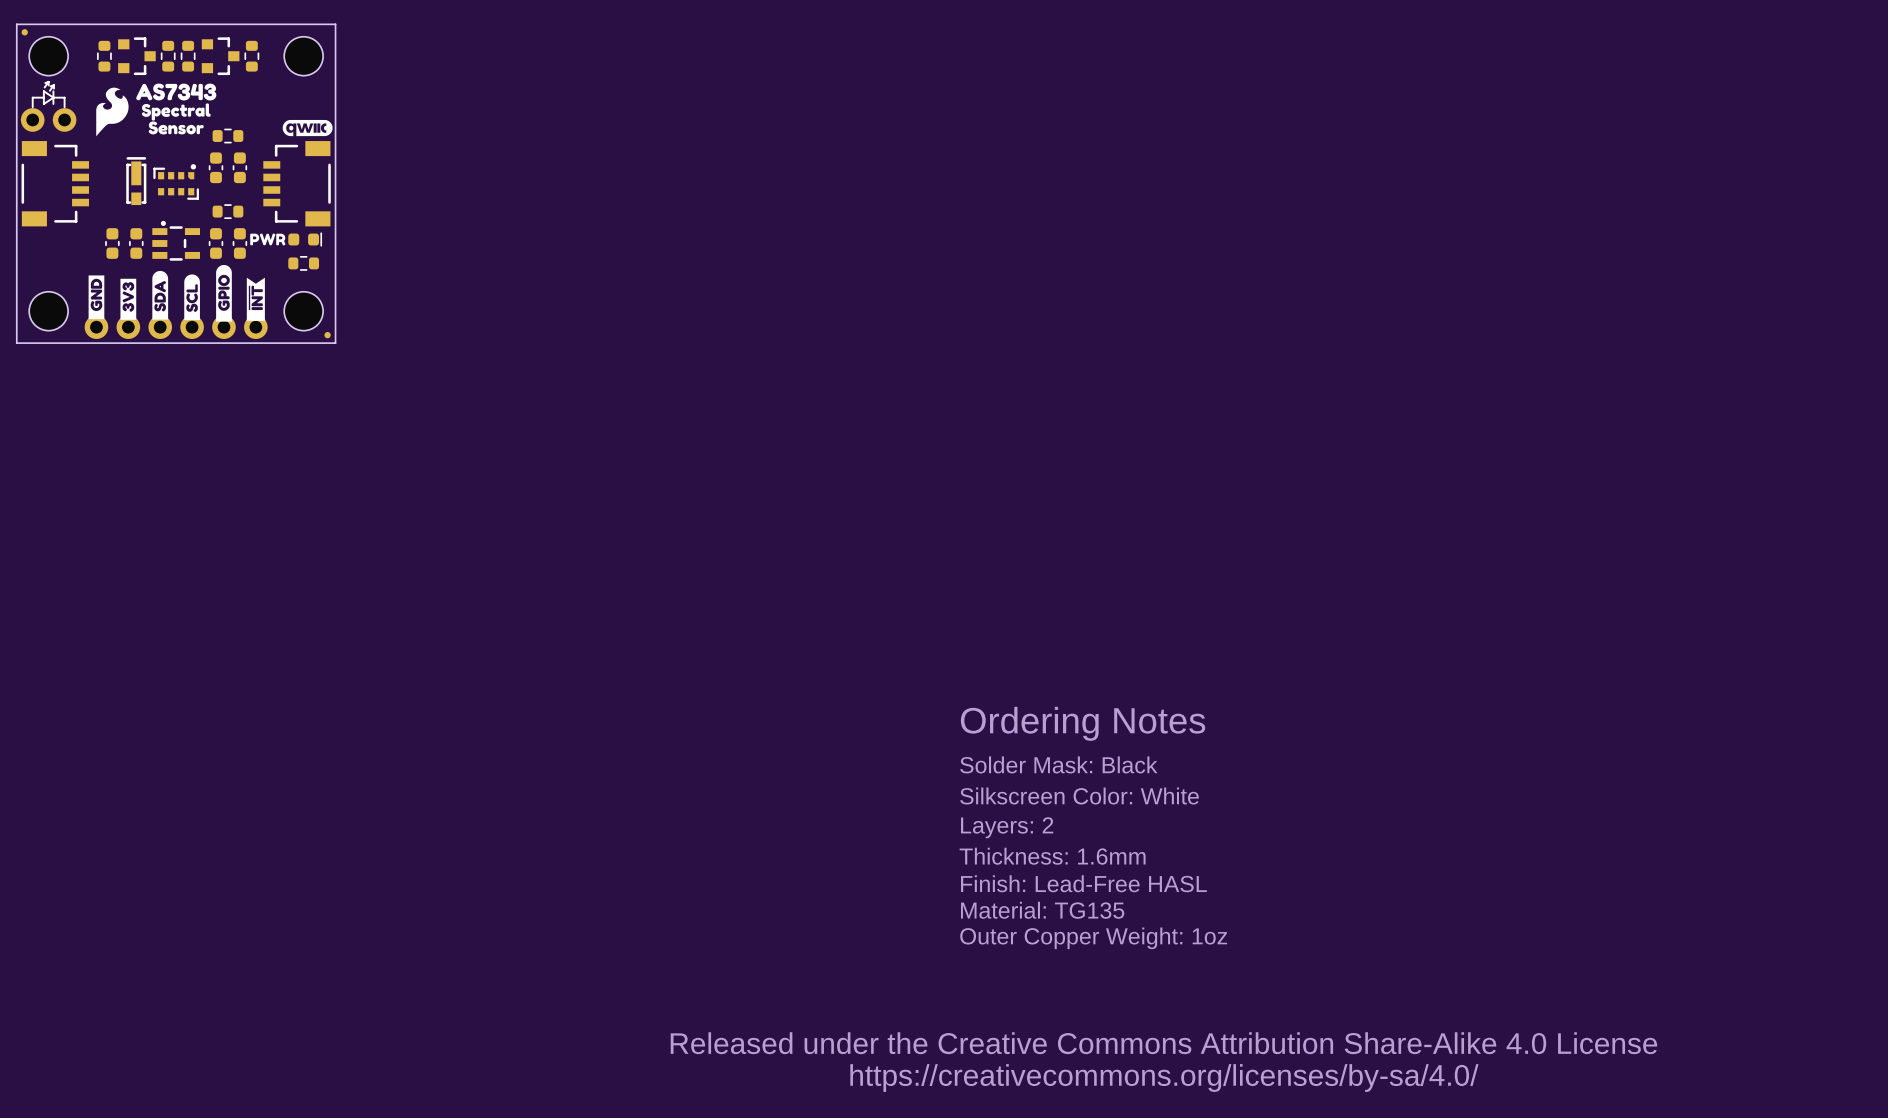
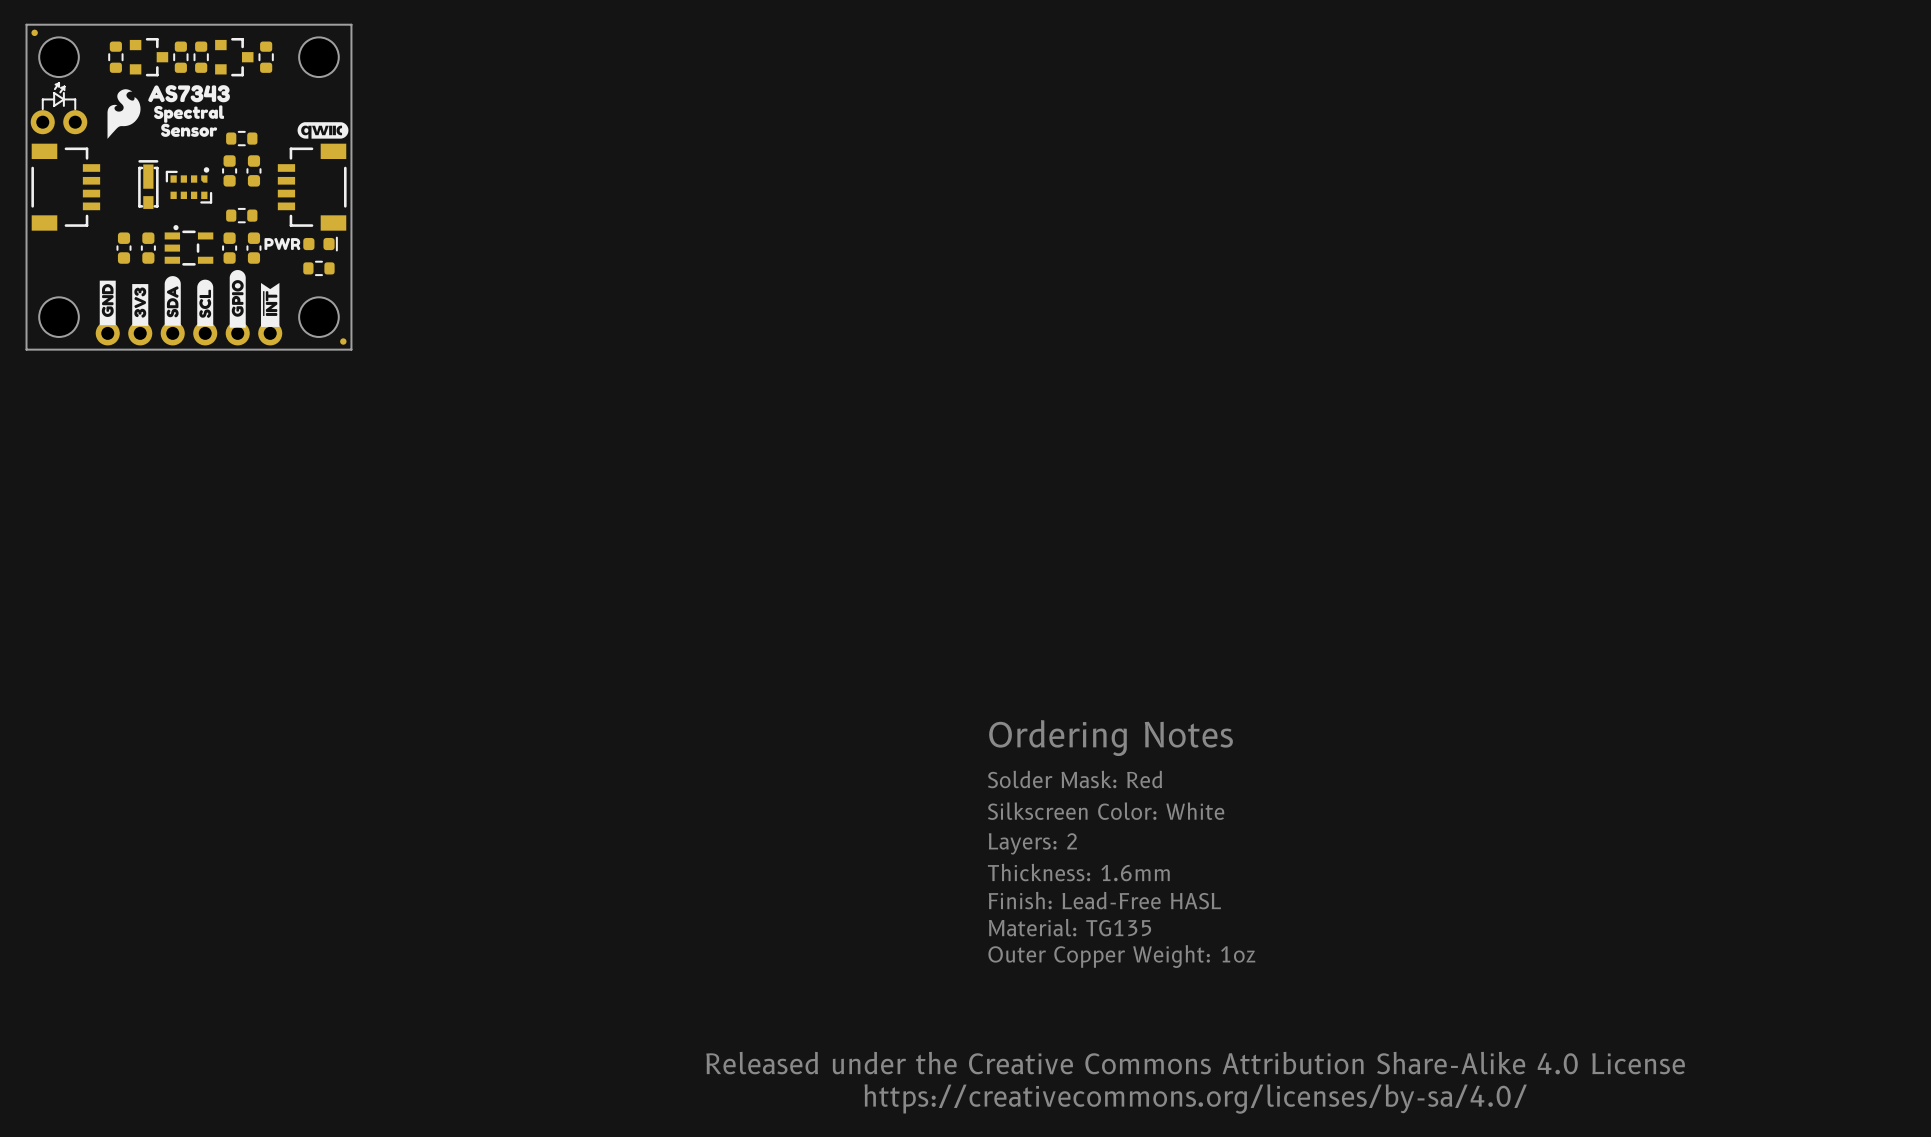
text: Solder Mask: Black (1058, 764) -> Solder Mask: Red (1074, 779)

